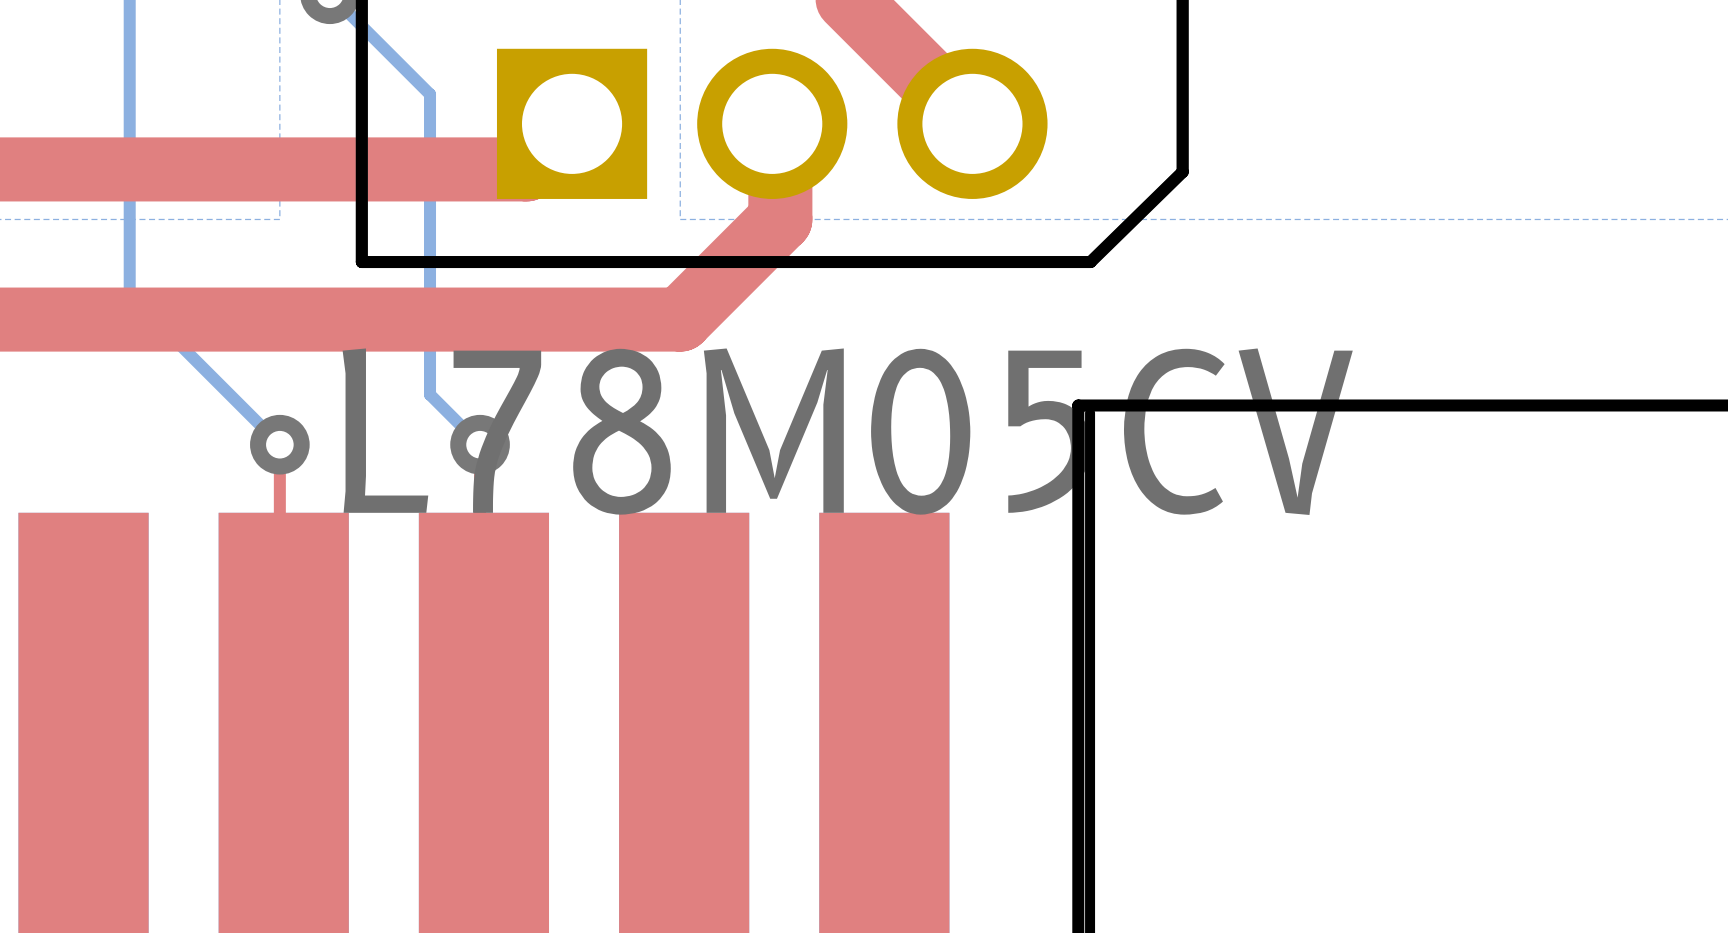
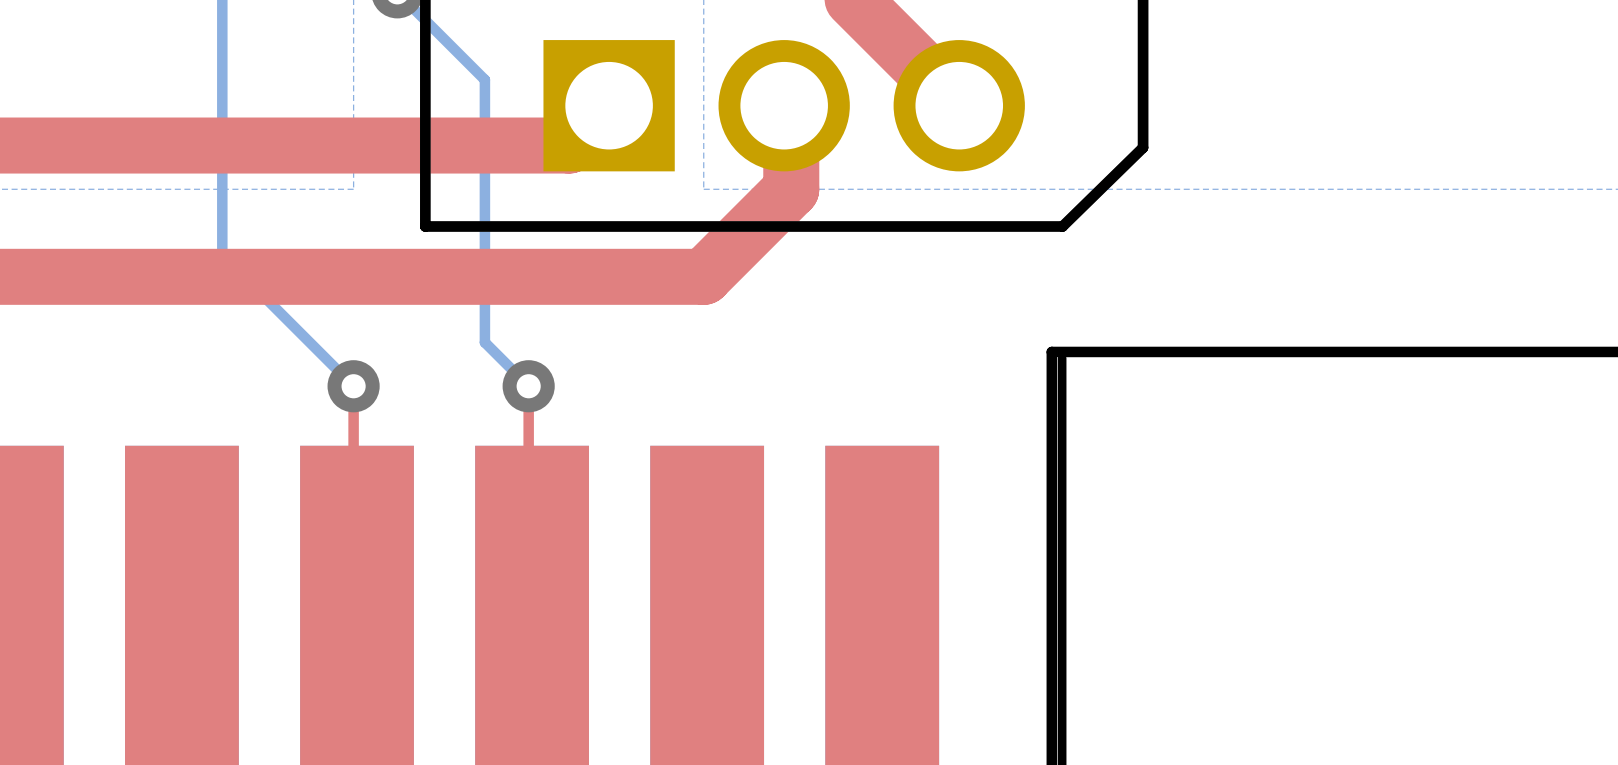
part value: L78M05CV (847, 431) -> none

